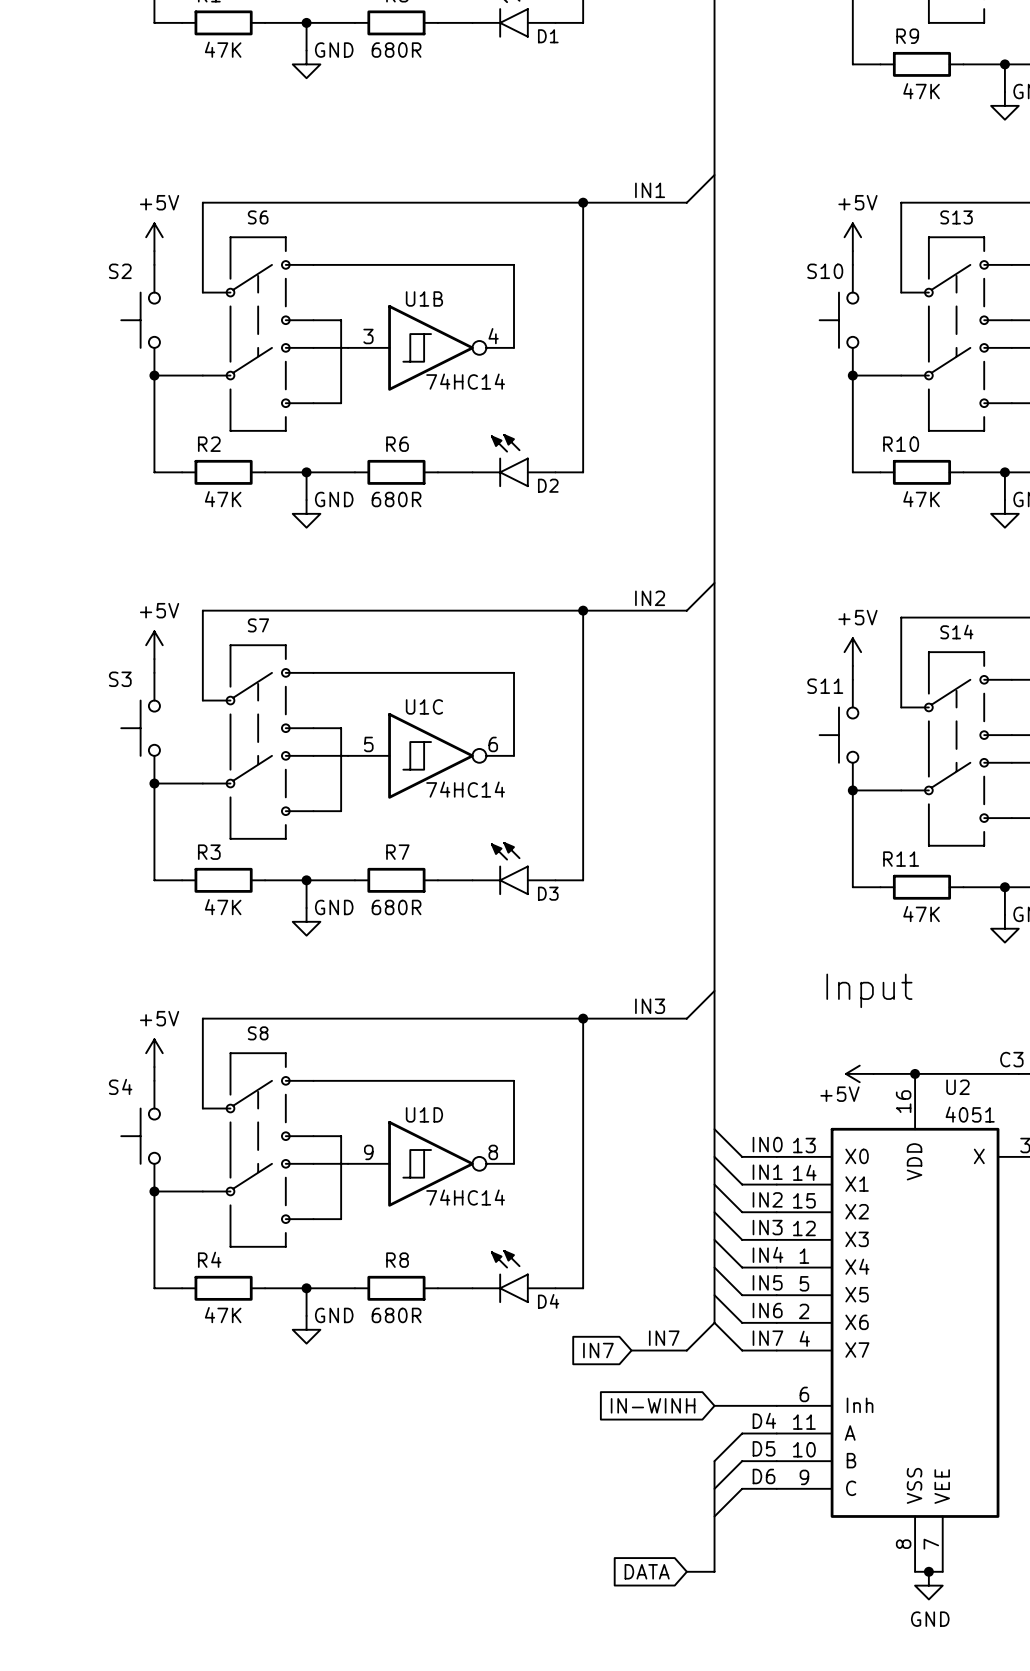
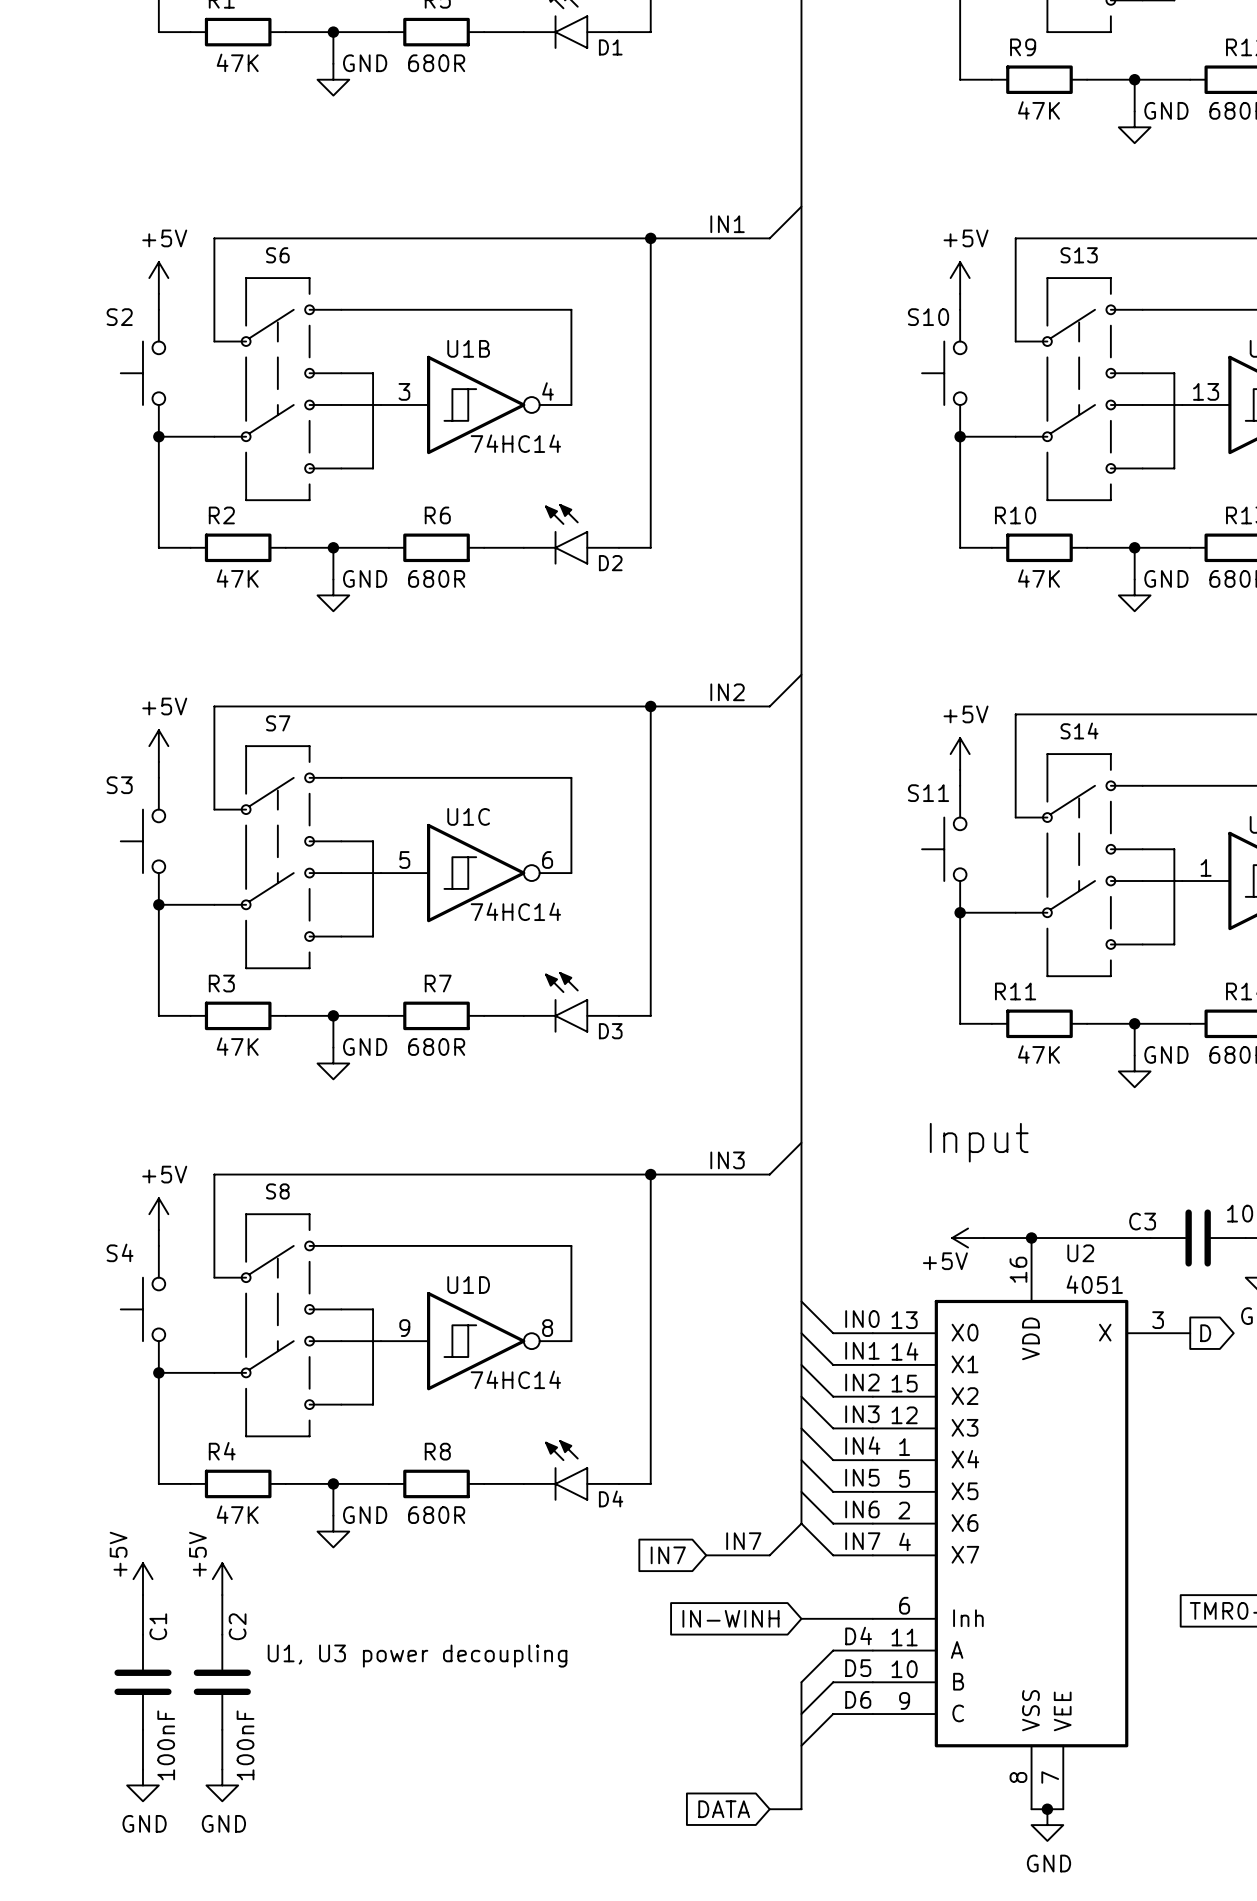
power symbol: none -> +5V (142, 1579)
power symbol: none -> +5V (222, 1579)
wire: none -> (142, 1595) (142, 1634)
wire: none -> (222, 1595) (222, 1634)
text: none -> U1, U3 power decoupling (417, 1656)
C1: none -> 100nF (142, 1682)
C2: none -> 100nF (222, 1682)
wire: none -> (142, 1729) (142, 1769)
wire: none -> (222, 1729) (222, 1769)
power symbol: none -> GND (142, 1785)
power symbol: none -> GND (222, 1785)

